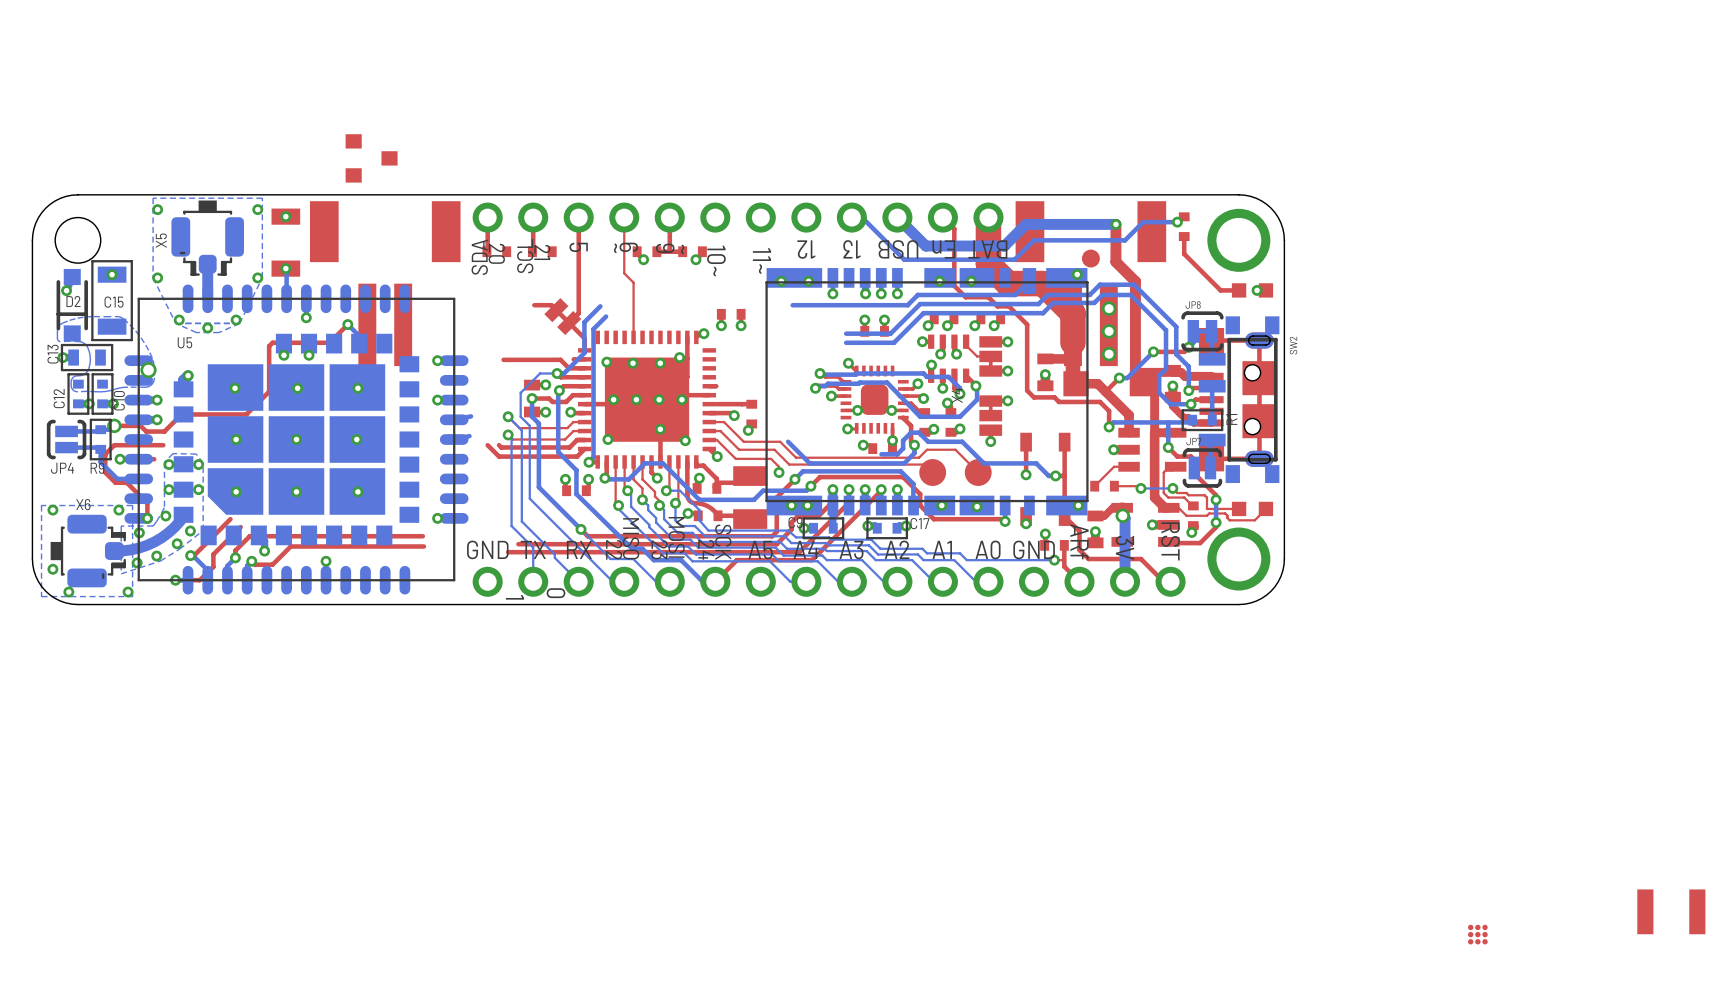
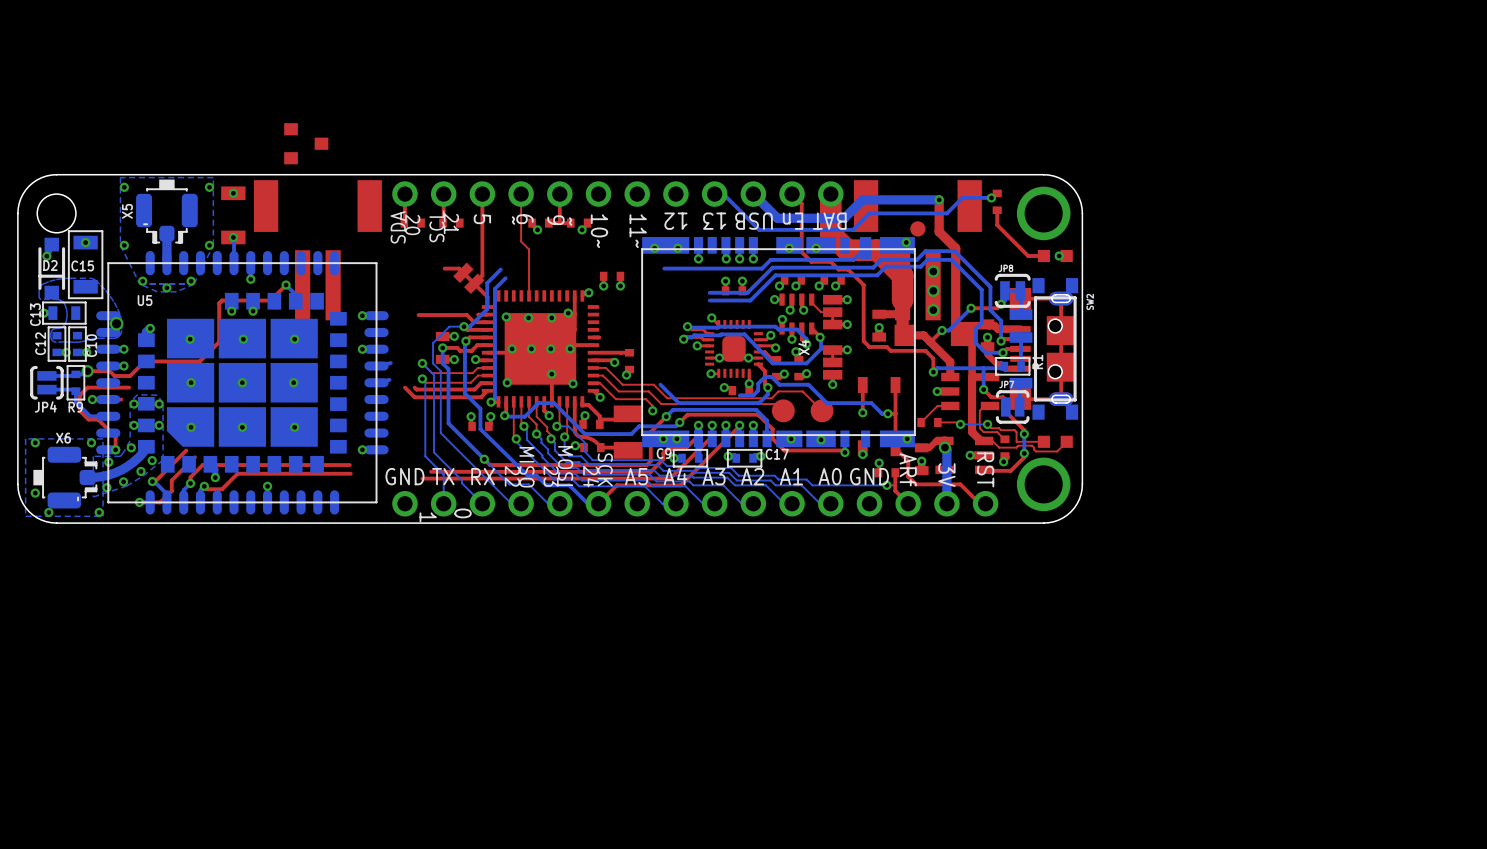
part: (1671, 911) -> none
part: (1477, 934) -> none

